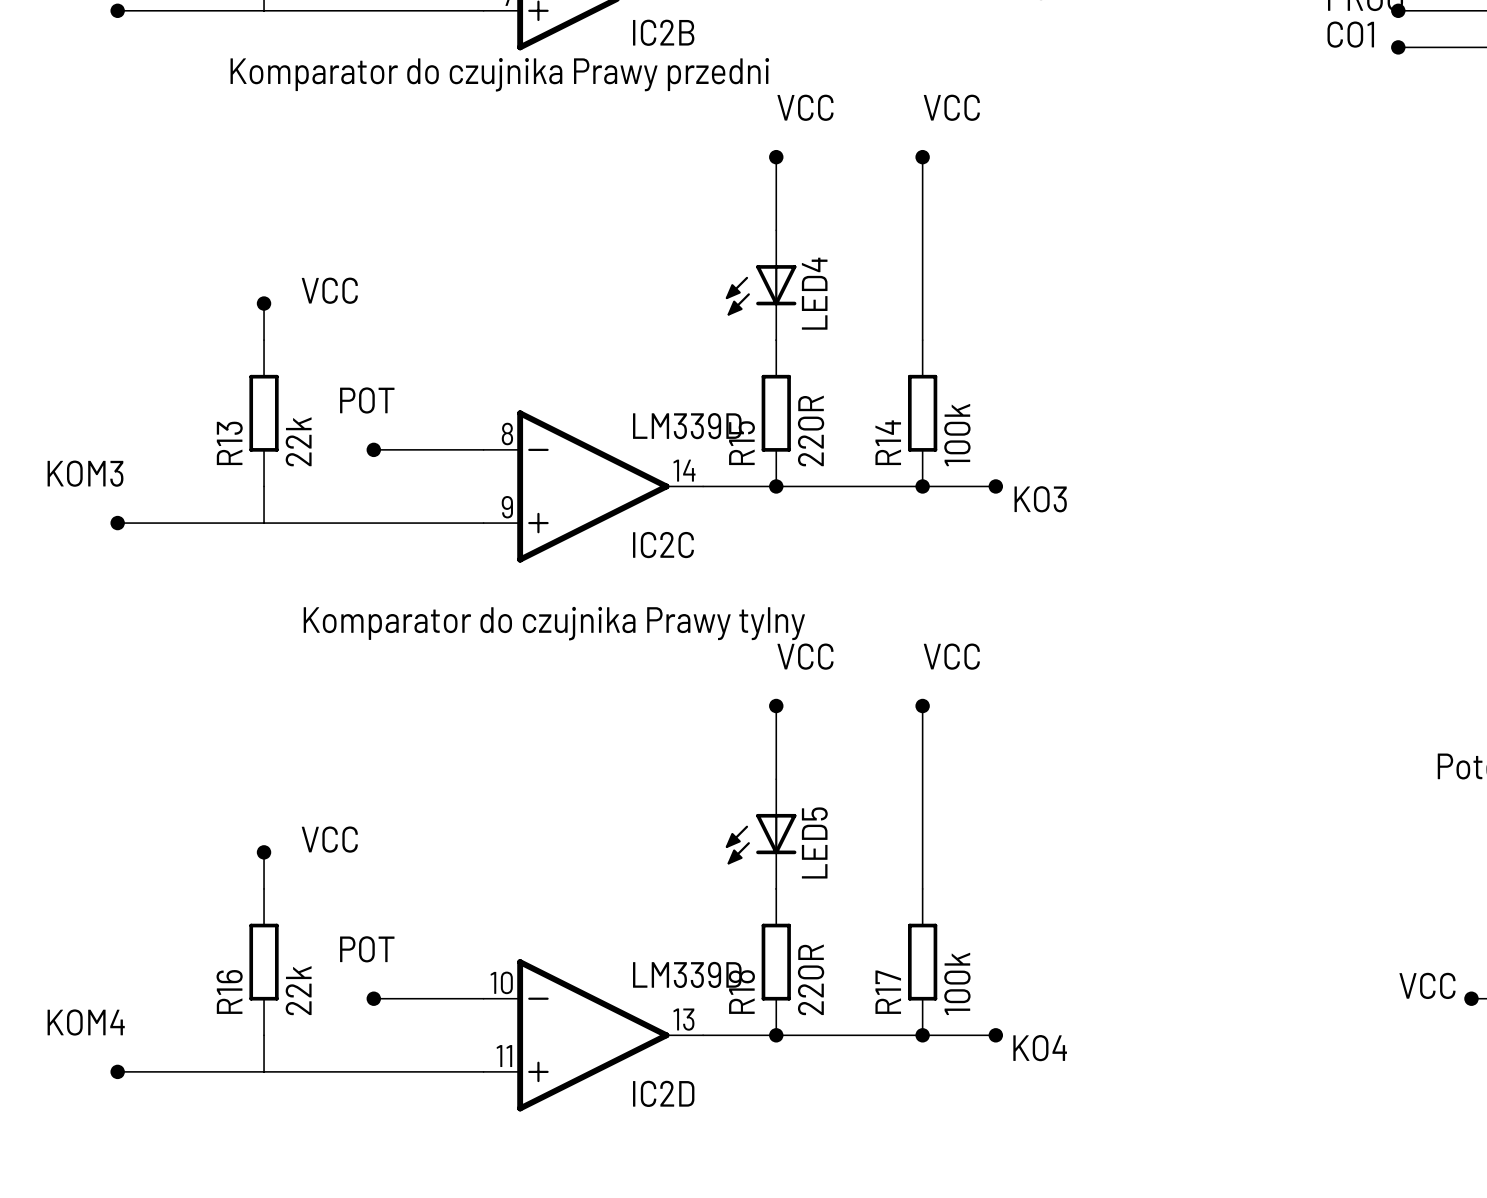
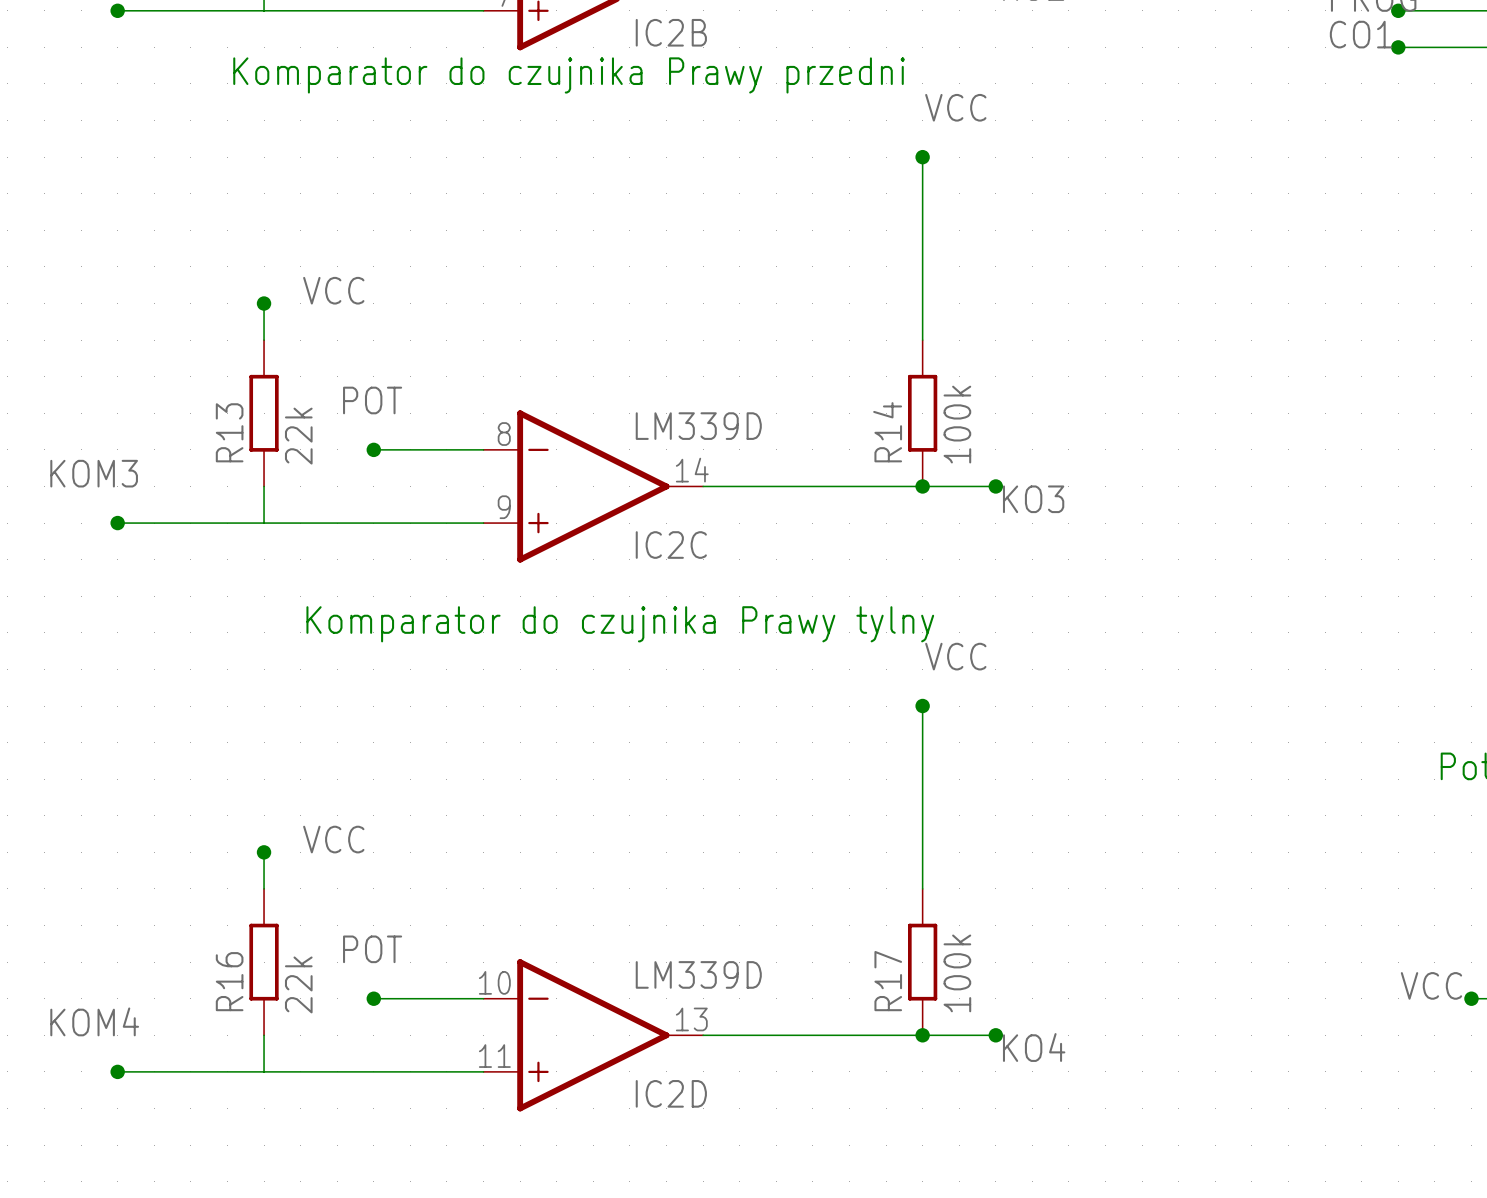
label: VCC (805, 107) -> none
wire: (776, 157) (776, 230) -> none
junction: (776, 157) -> none
LED4: (761, 285) -> none
R15: 220R (776, 413) -> none
junction: (776, 486) -> none
label: VCC (805, 656) -> none
wire: (776, 706) (776, 779) -> none
junction: (776, 706) -> none
LED5: (761, 834) -> none
R18: 220R (776, 962) -> none
junction: (776, 1035) -> none

